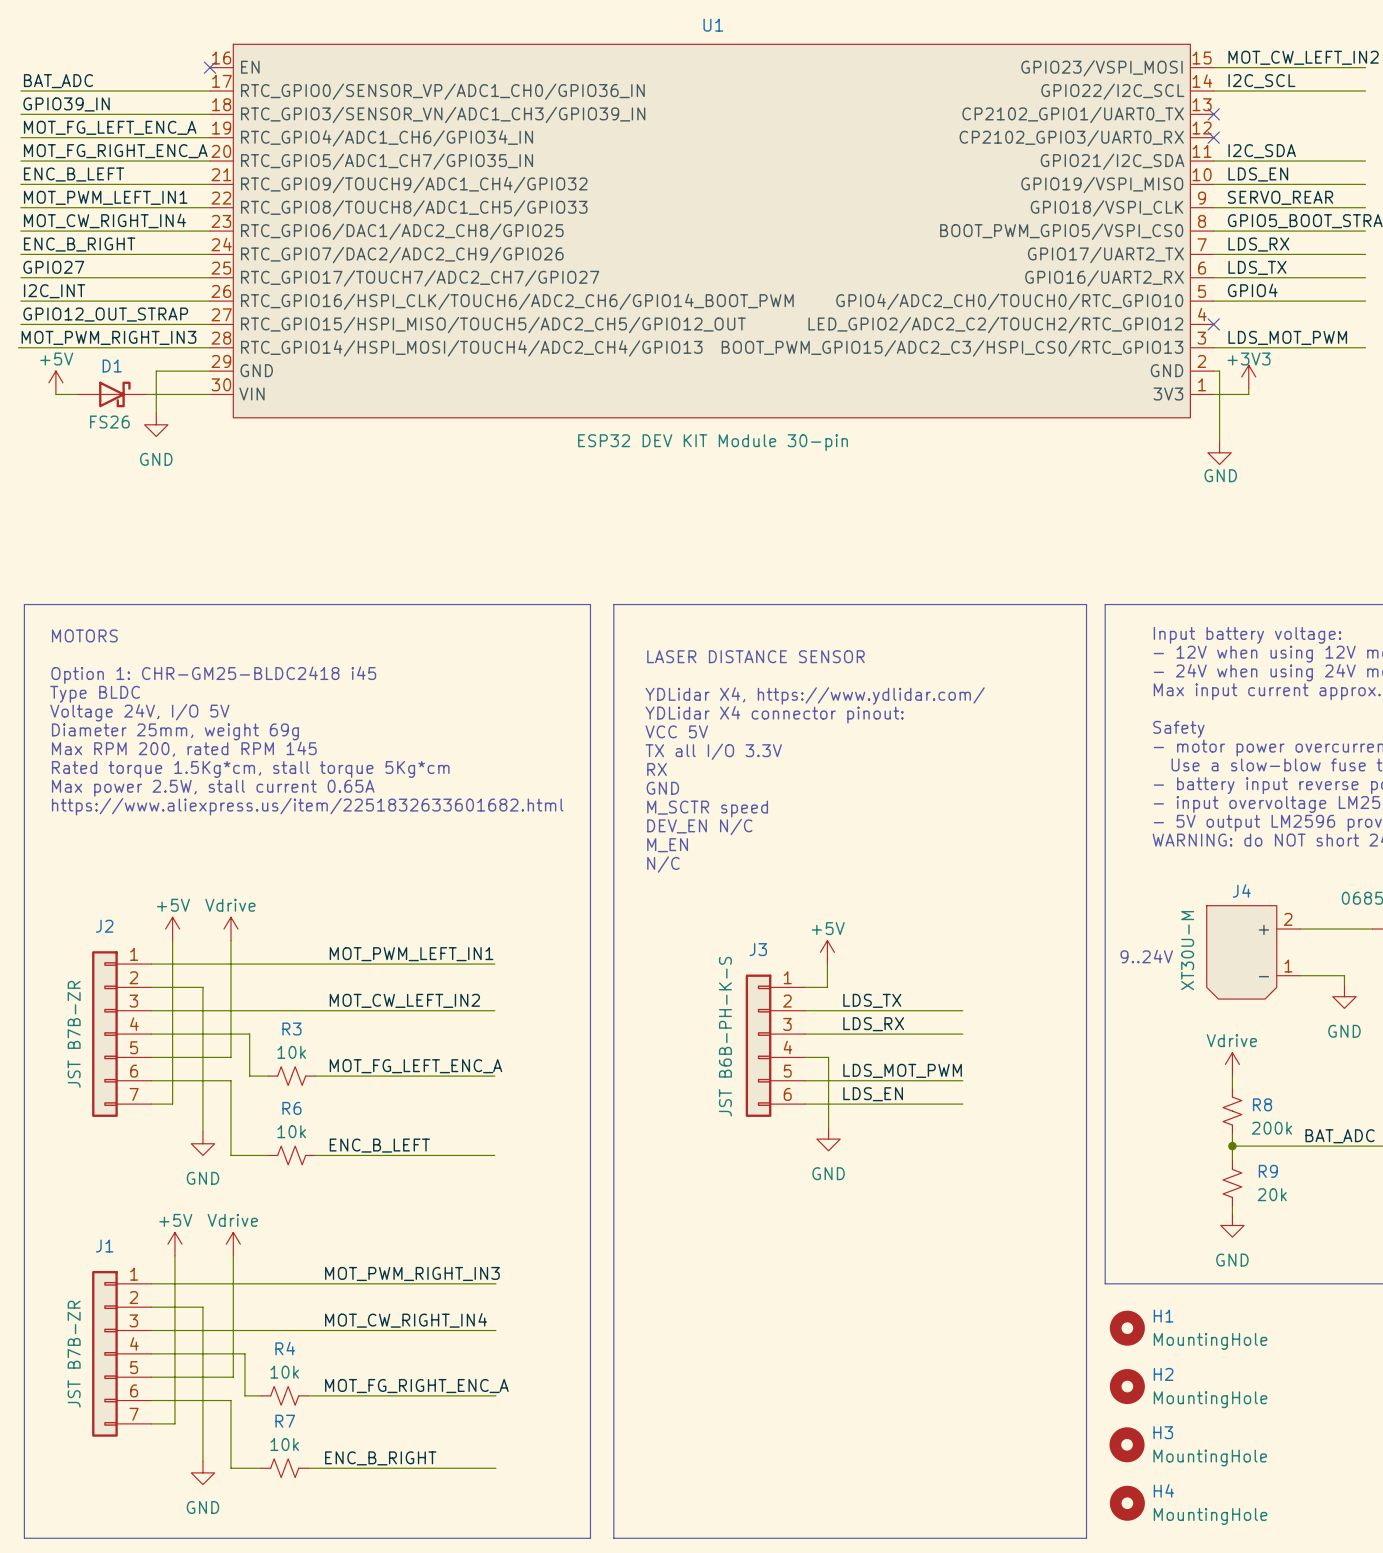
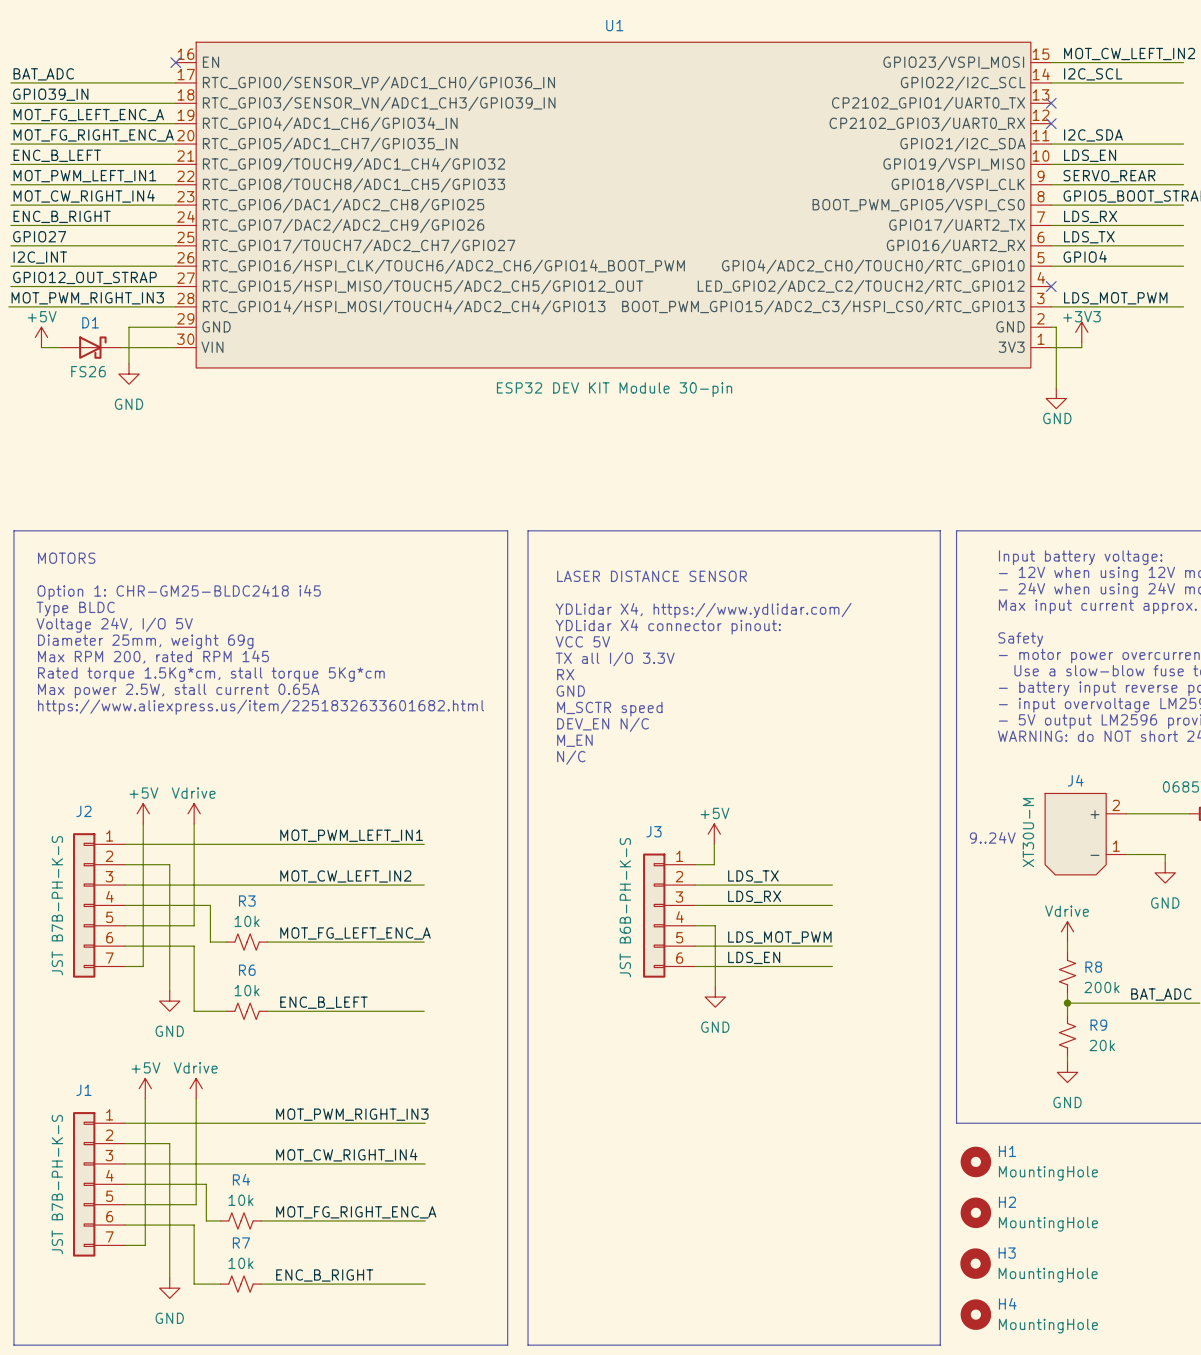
J2 value: JST B7B-ZR (74, 1034) -> JST B7B-PH-K-S (57, 905)
J1 value: JST B7B-ZR (74, 1354) -> JST B7B-PH-K-S (57, 1184)

